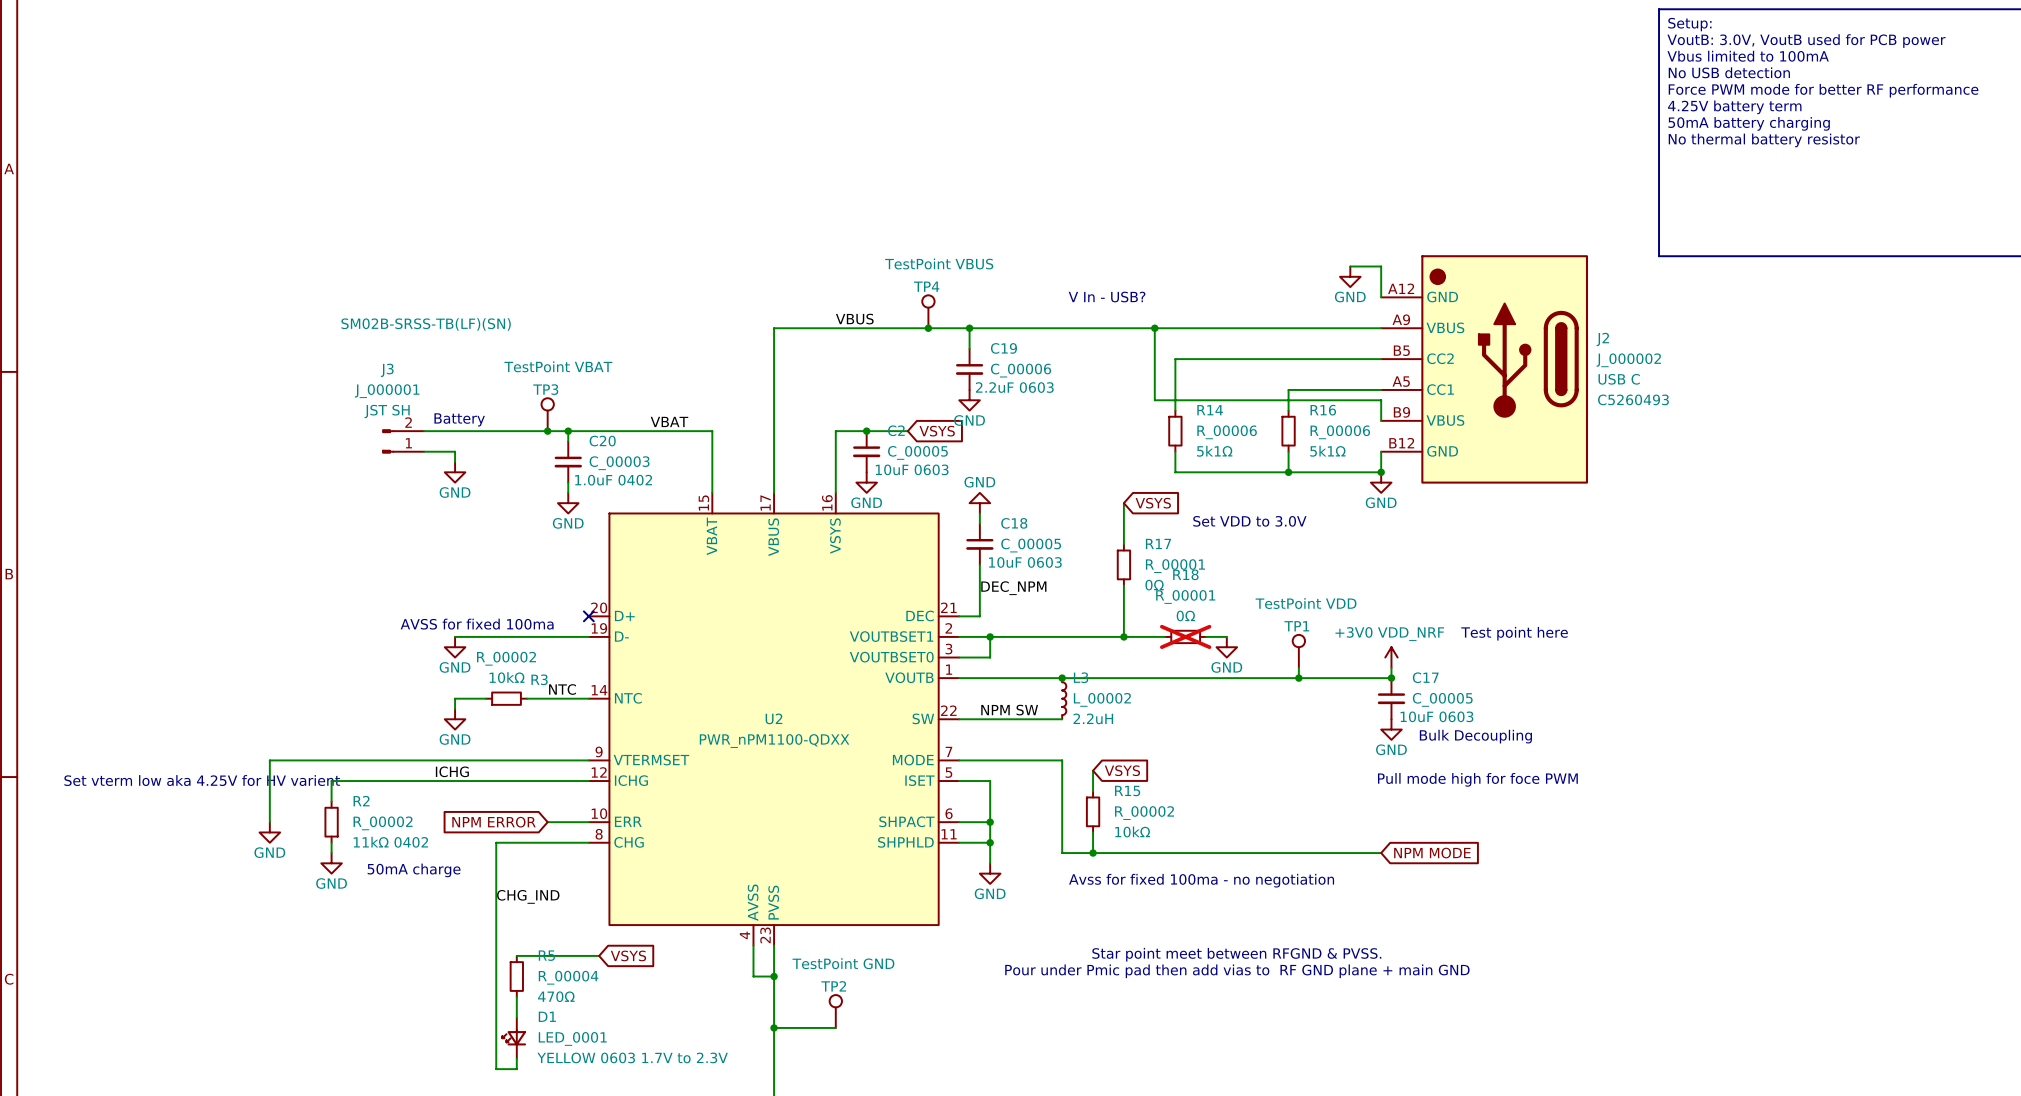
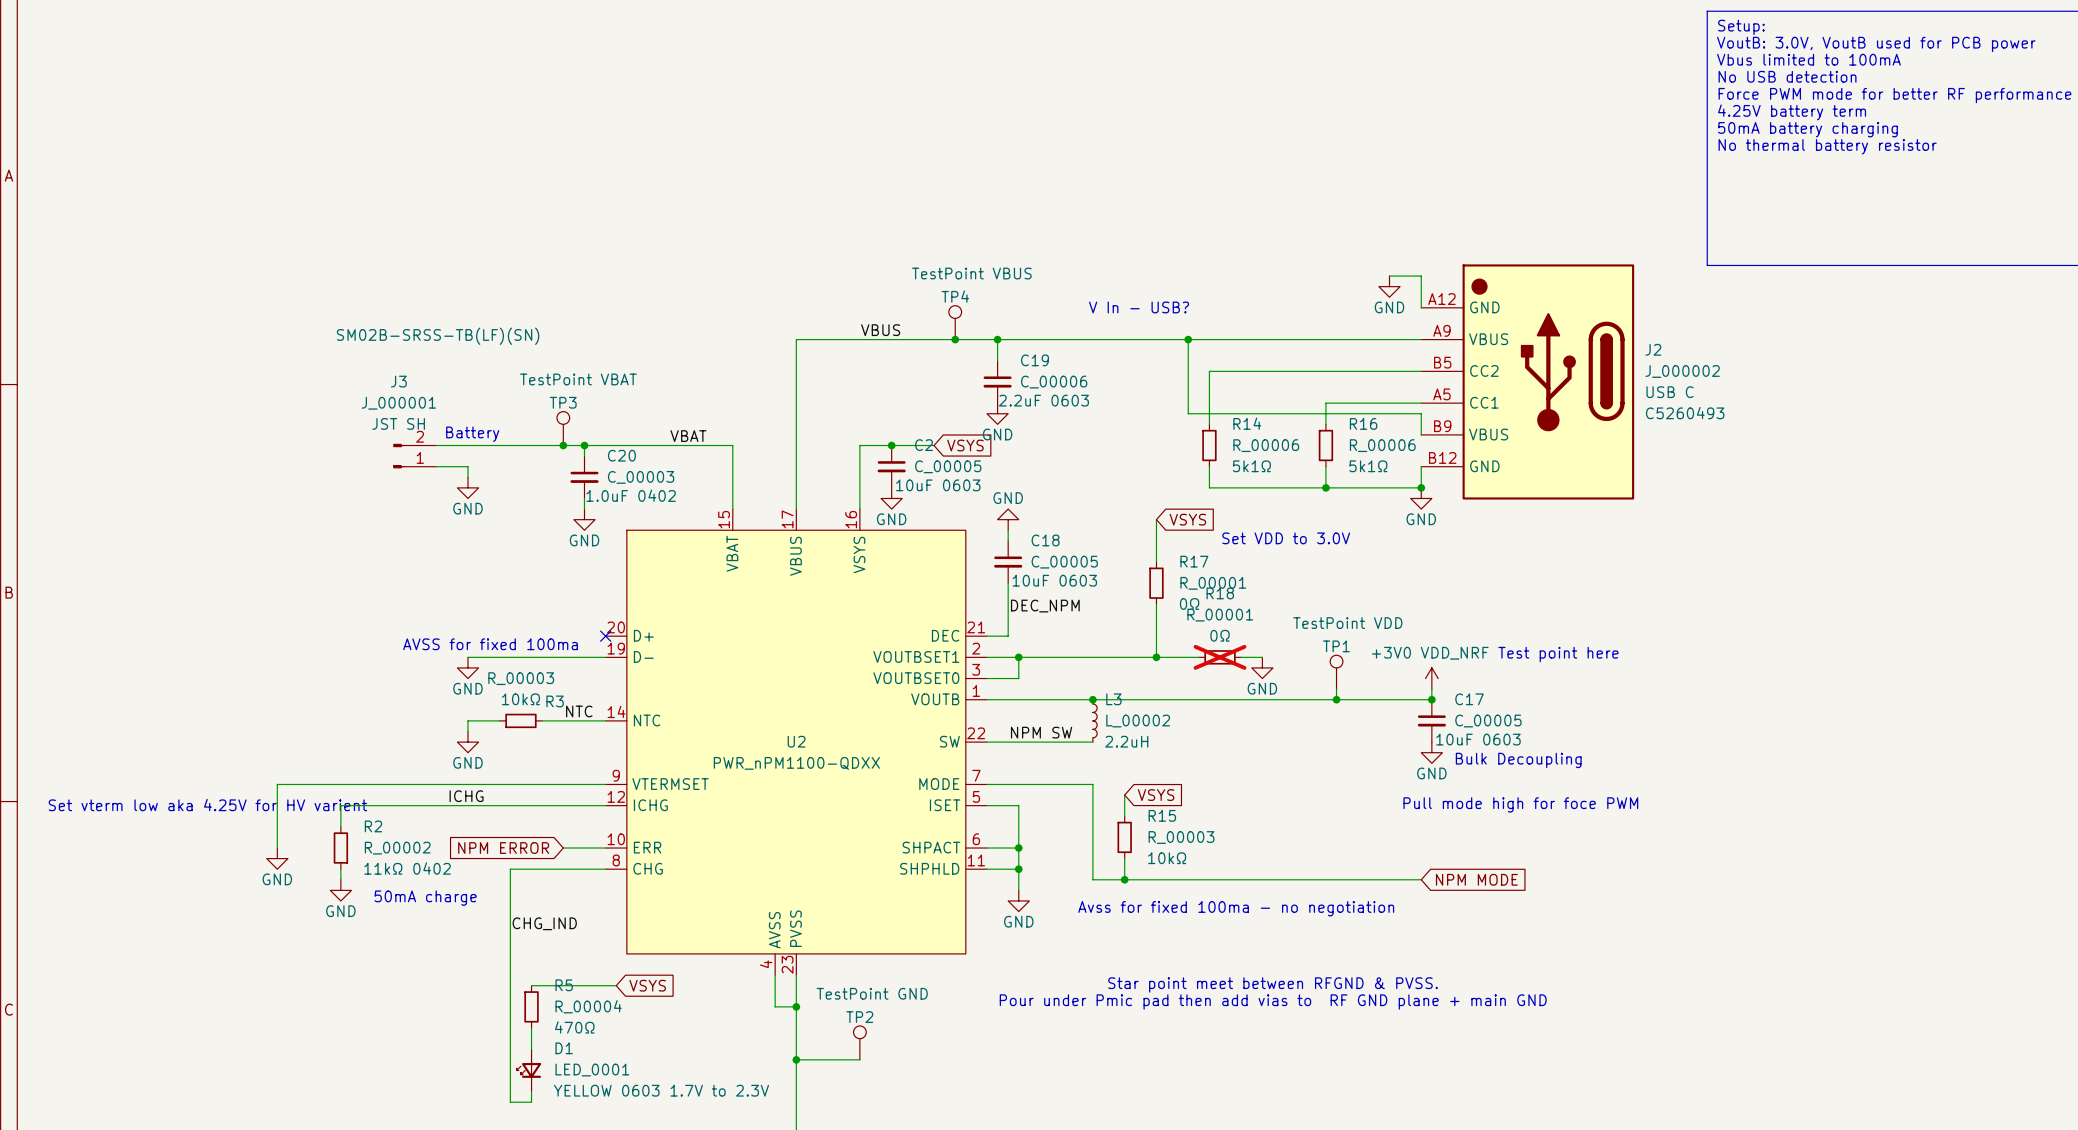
R3 value: R_00002 (506, 658) -> R_00003 (521, 678)
R15 value: R_00002 (1144, 813) -> R_00003 (1181, 837)

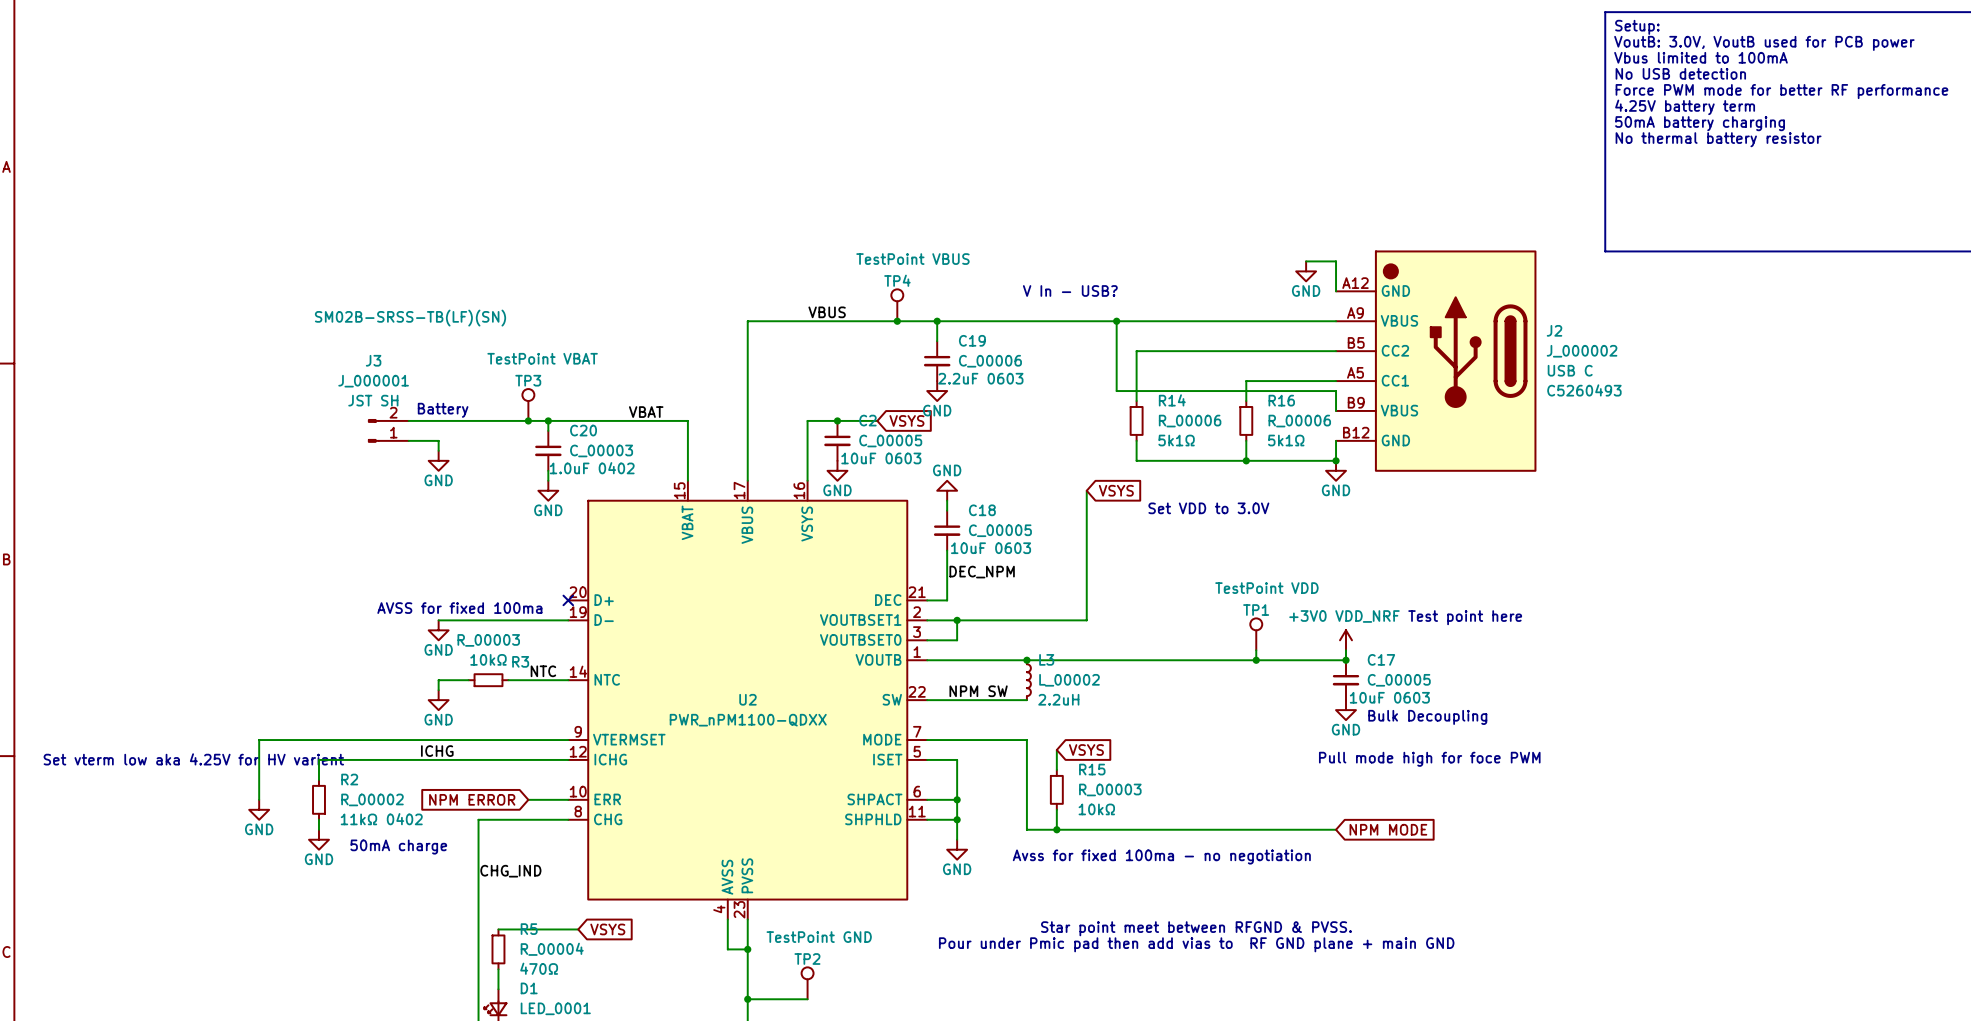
wire: none -> (1086, 530) (1086, 570)
R17: R_00001 (1156, 583) -> none
wire: (1156, 657) (1198, 657) -> none
junction: (1156, 657) -> none
R18: R_00001 (1220, 657) -> none
wire: (1241, 657) (1262, 657) -> none
power symbol: GND (1262, 667) -> none

